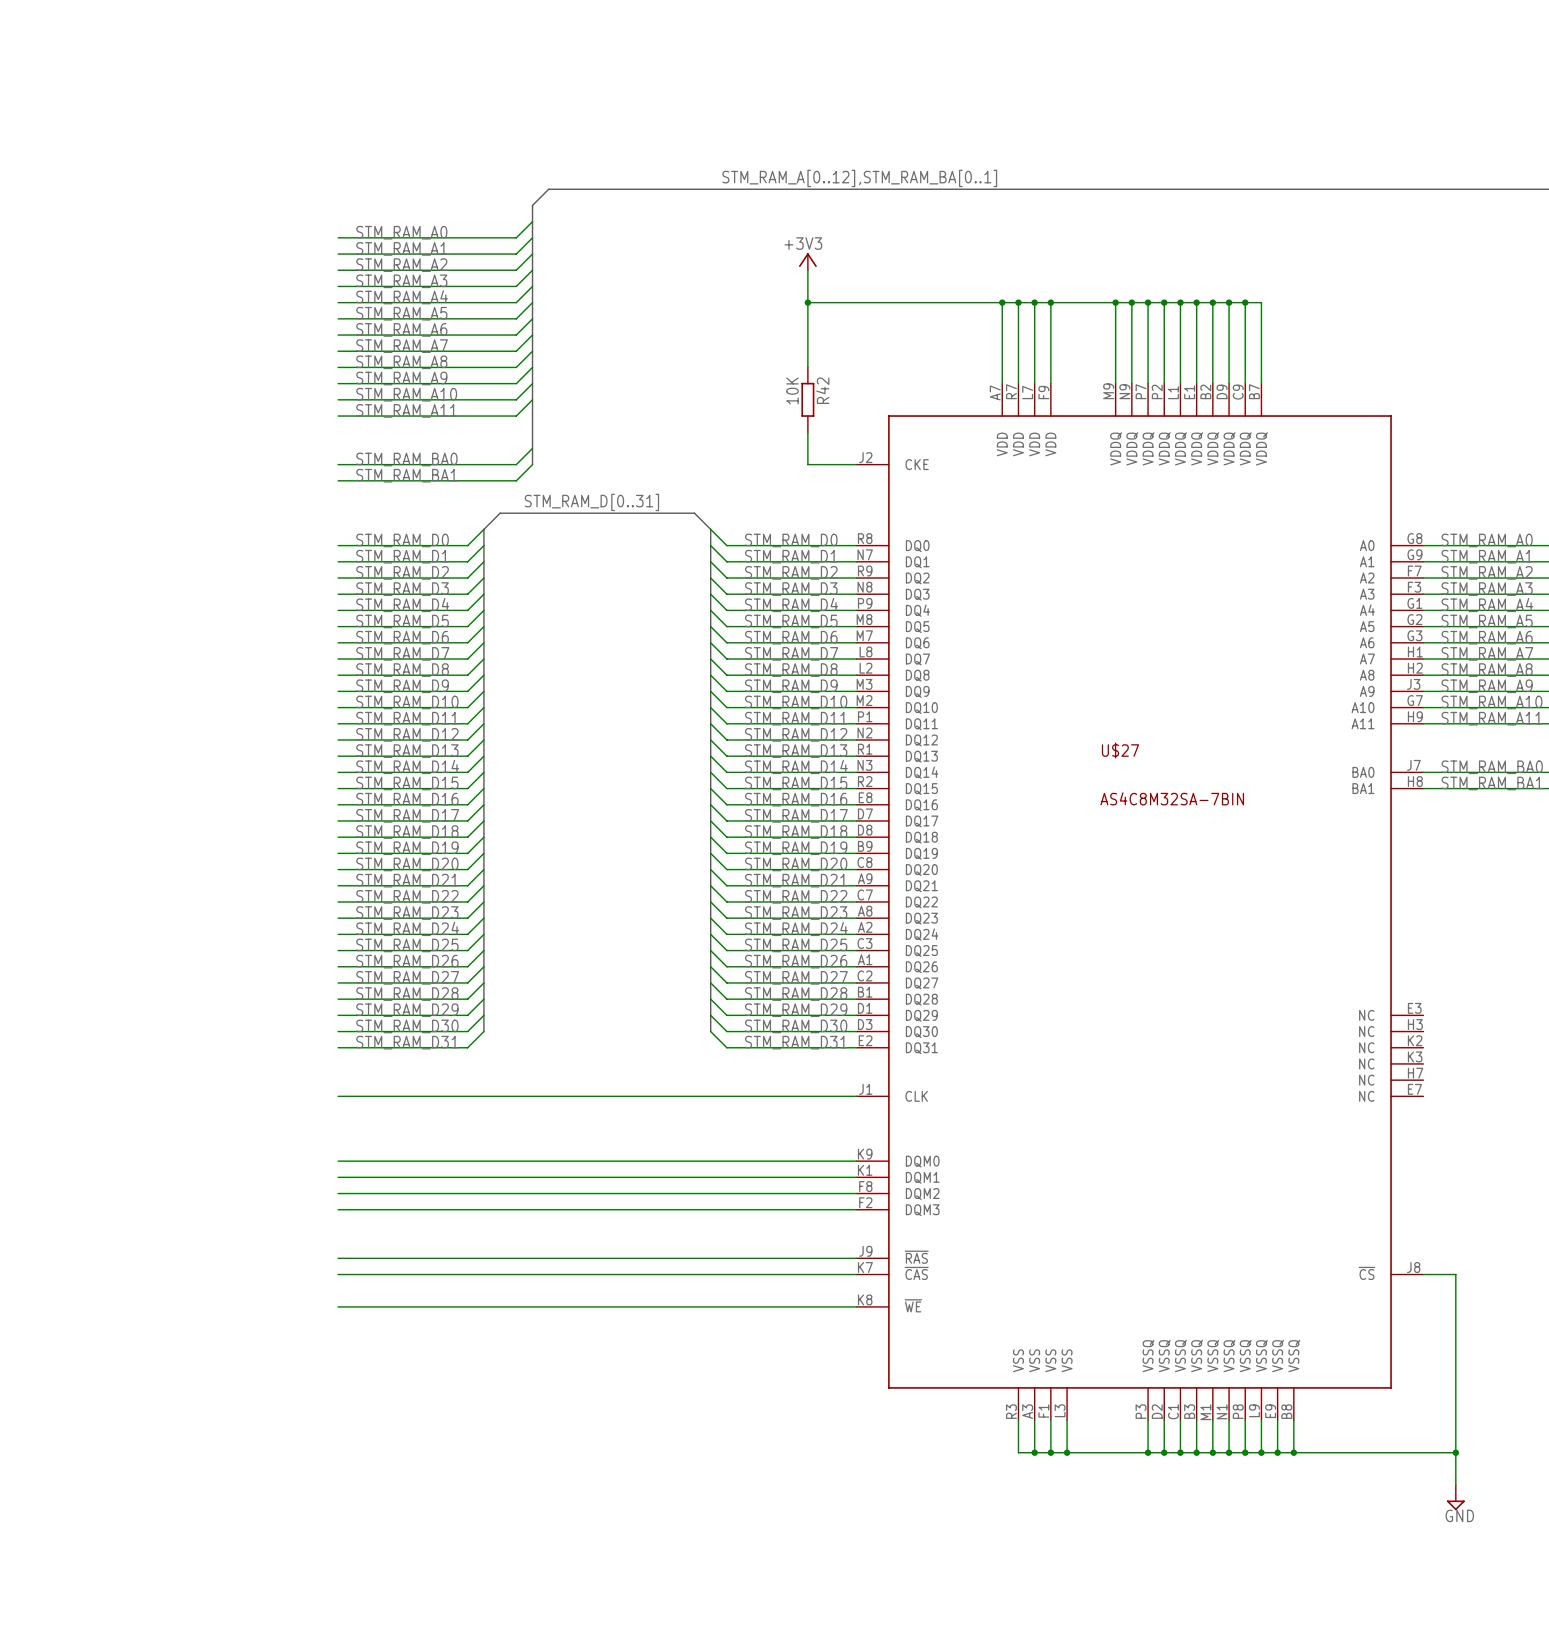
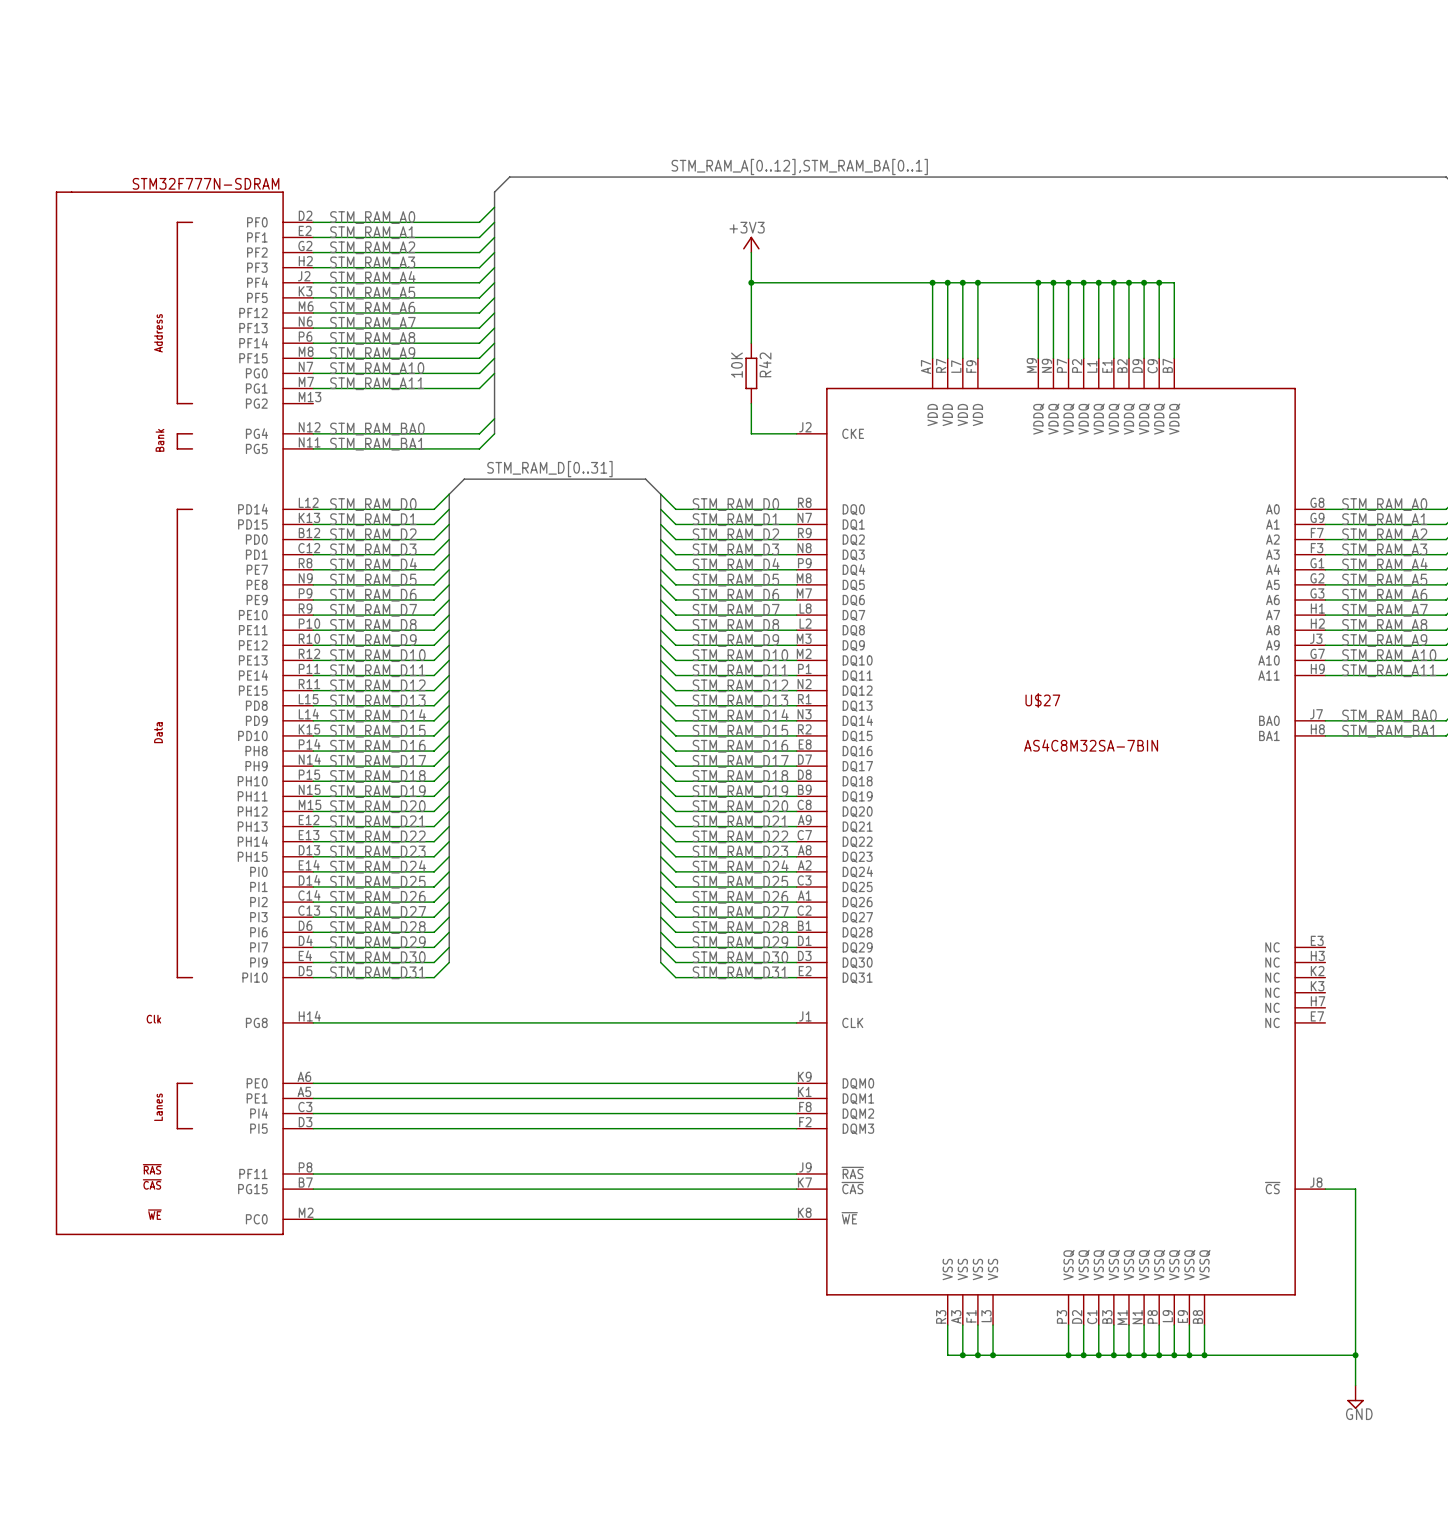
STM32F777N-SDRAM: none -> (184, 713)

